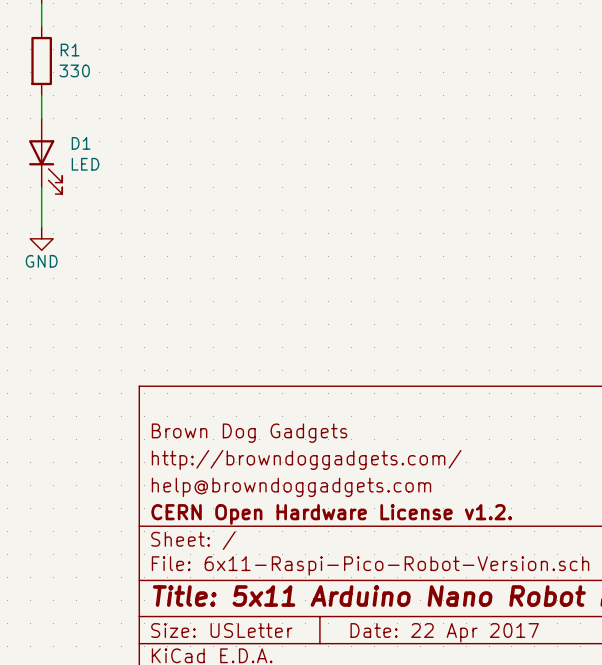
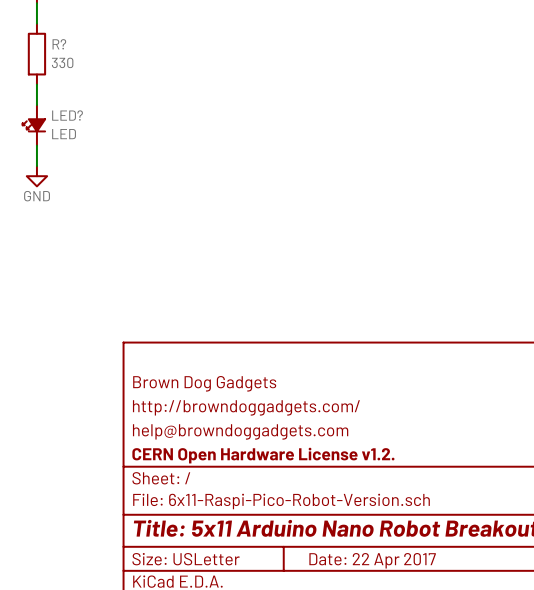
R1 name: R1 (70, 50) -> R? (59, 44)
LED?: none -> LED (33, 125)
D1: LED (45, 156) -> none
power symbol position: GND (41, 238) -> GND (36, 176)

